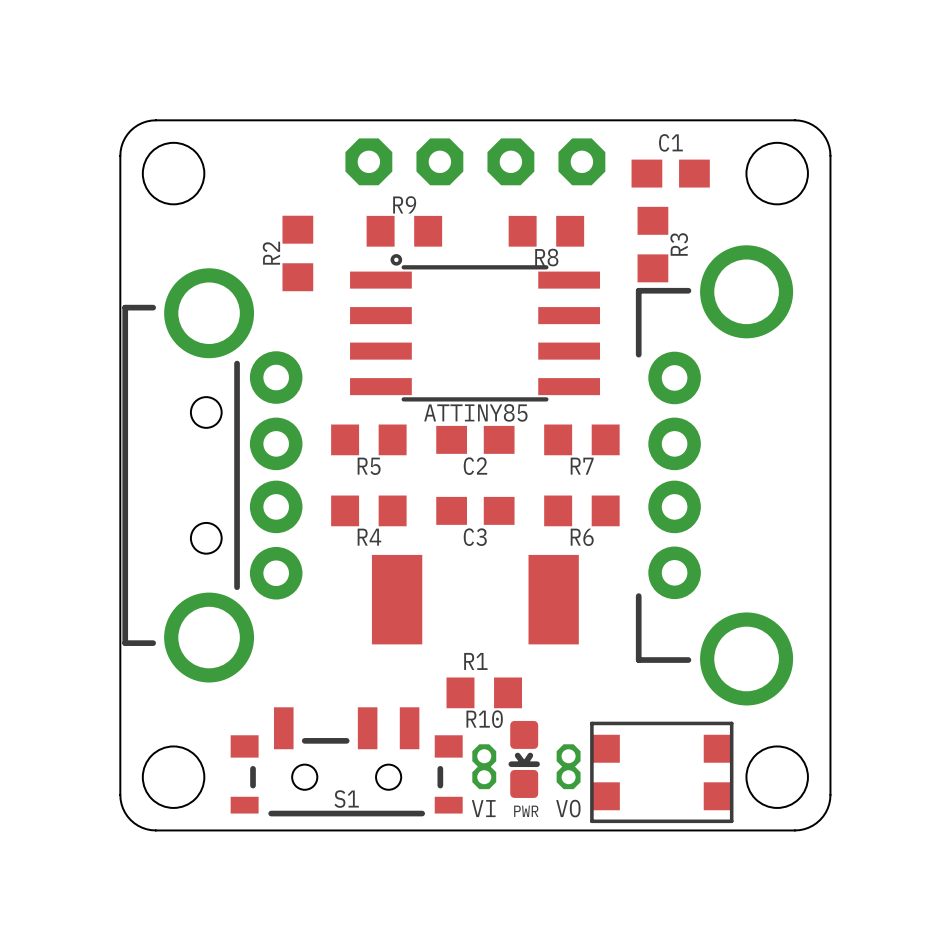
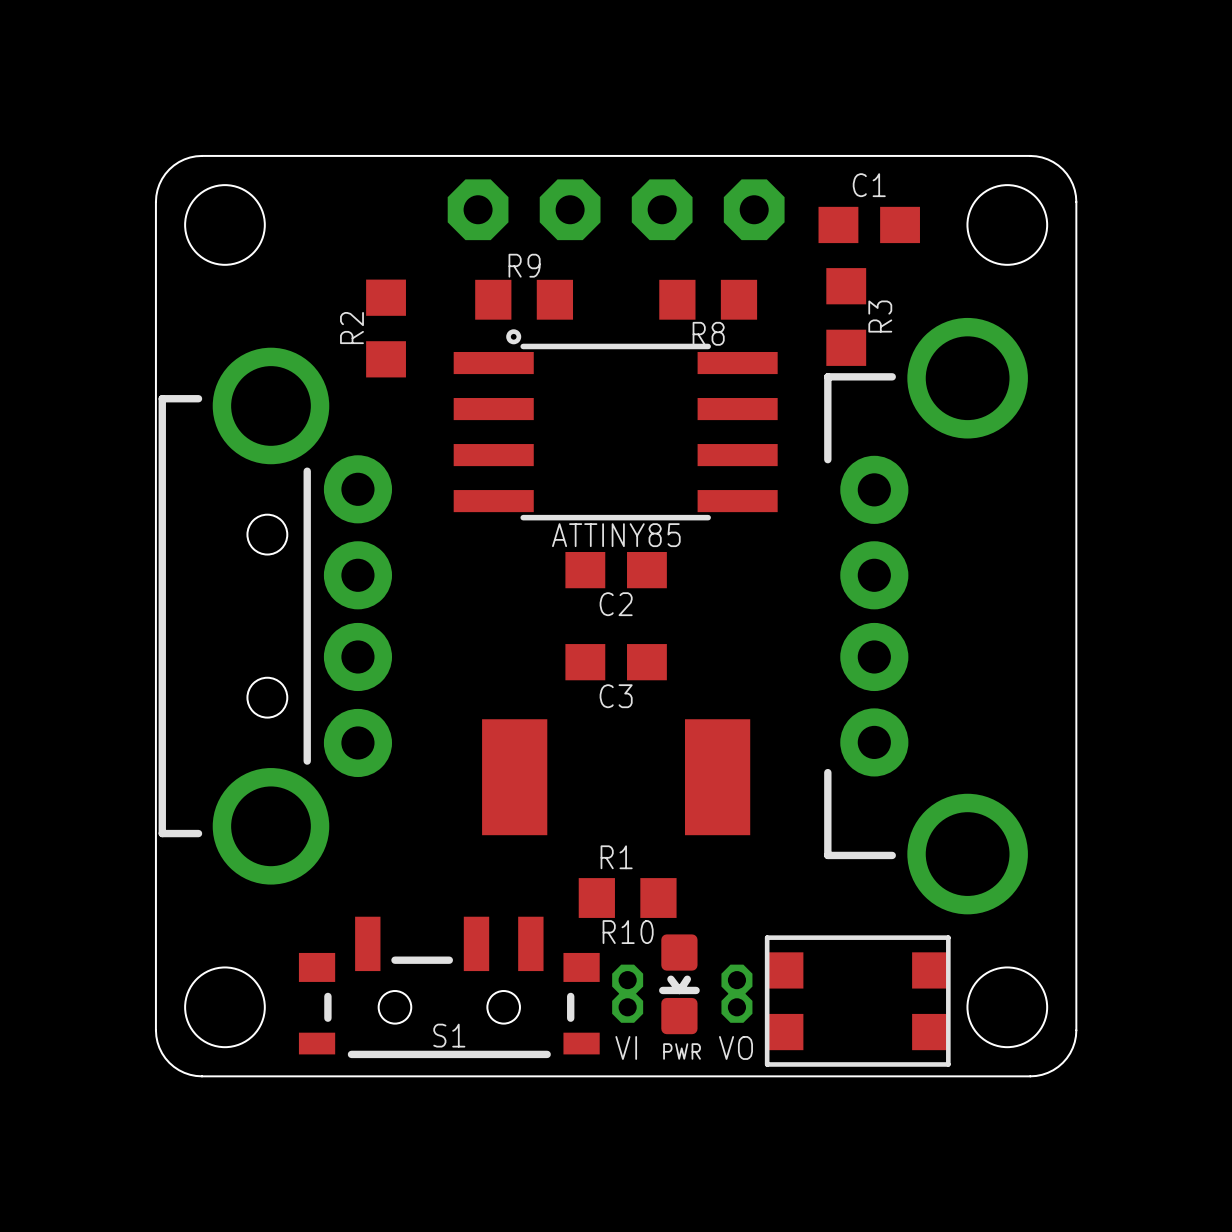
R5: (368, 439) -> none
R7: (581, 439) -> none
R4: (368, 510) -> none
R6: (581, 510) -> none

